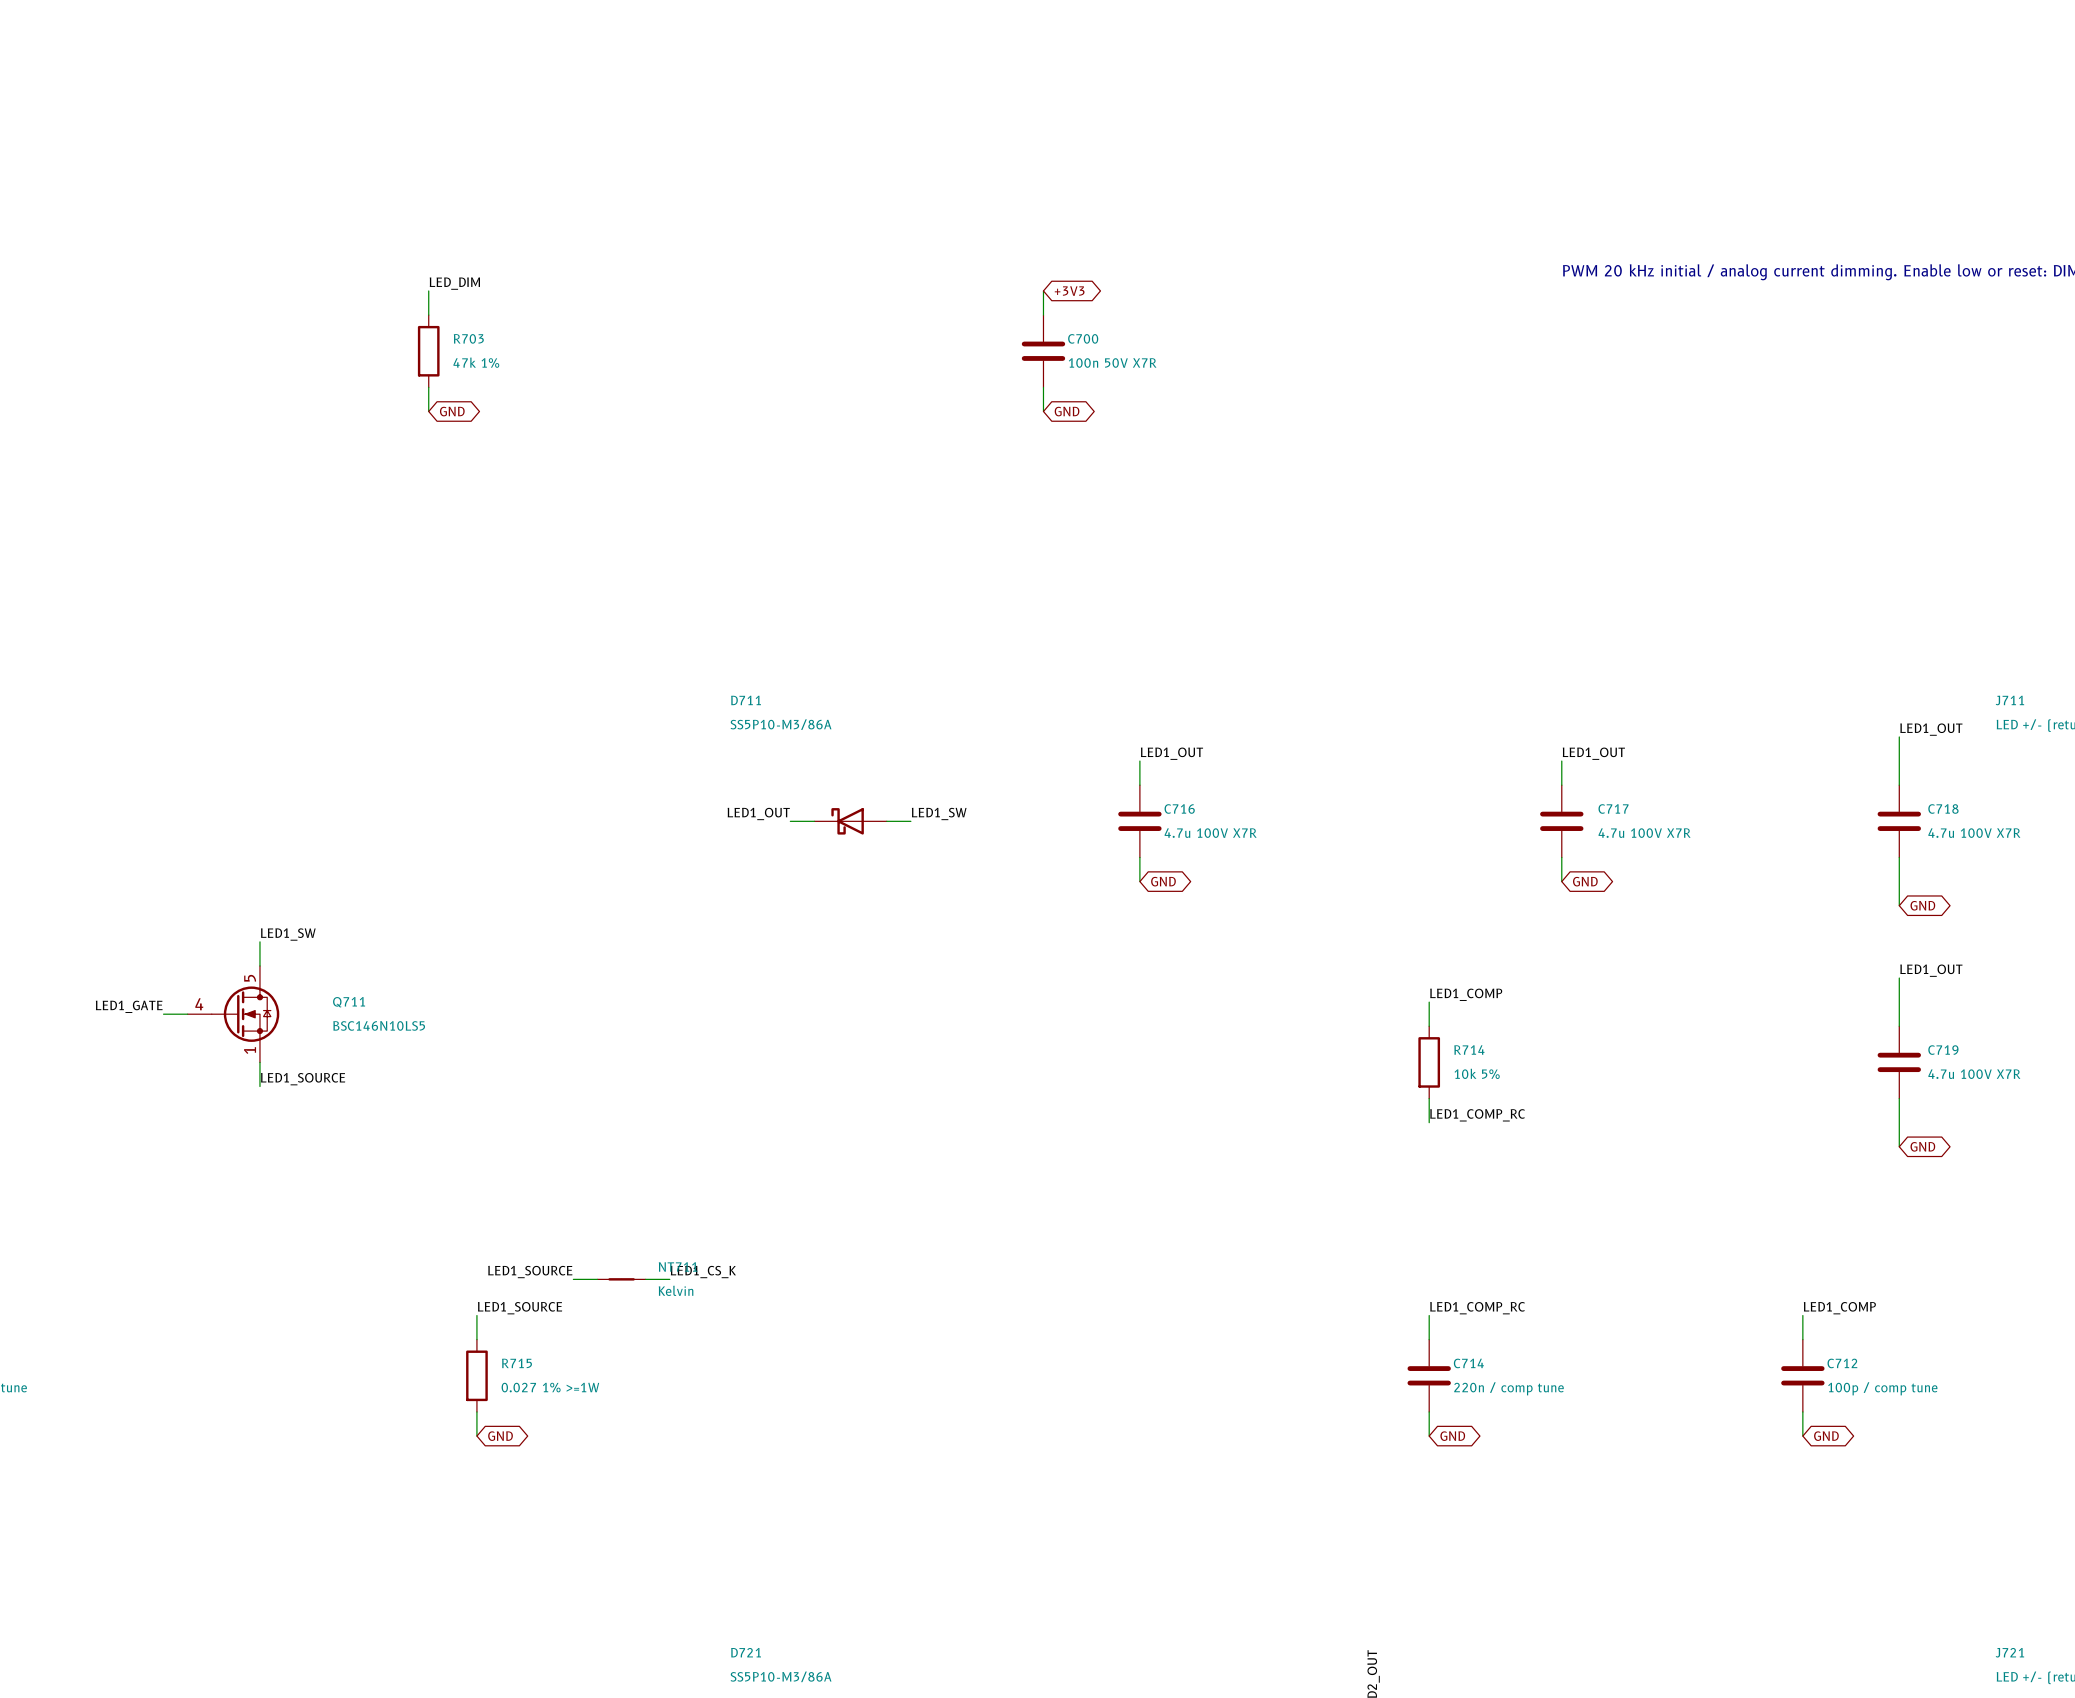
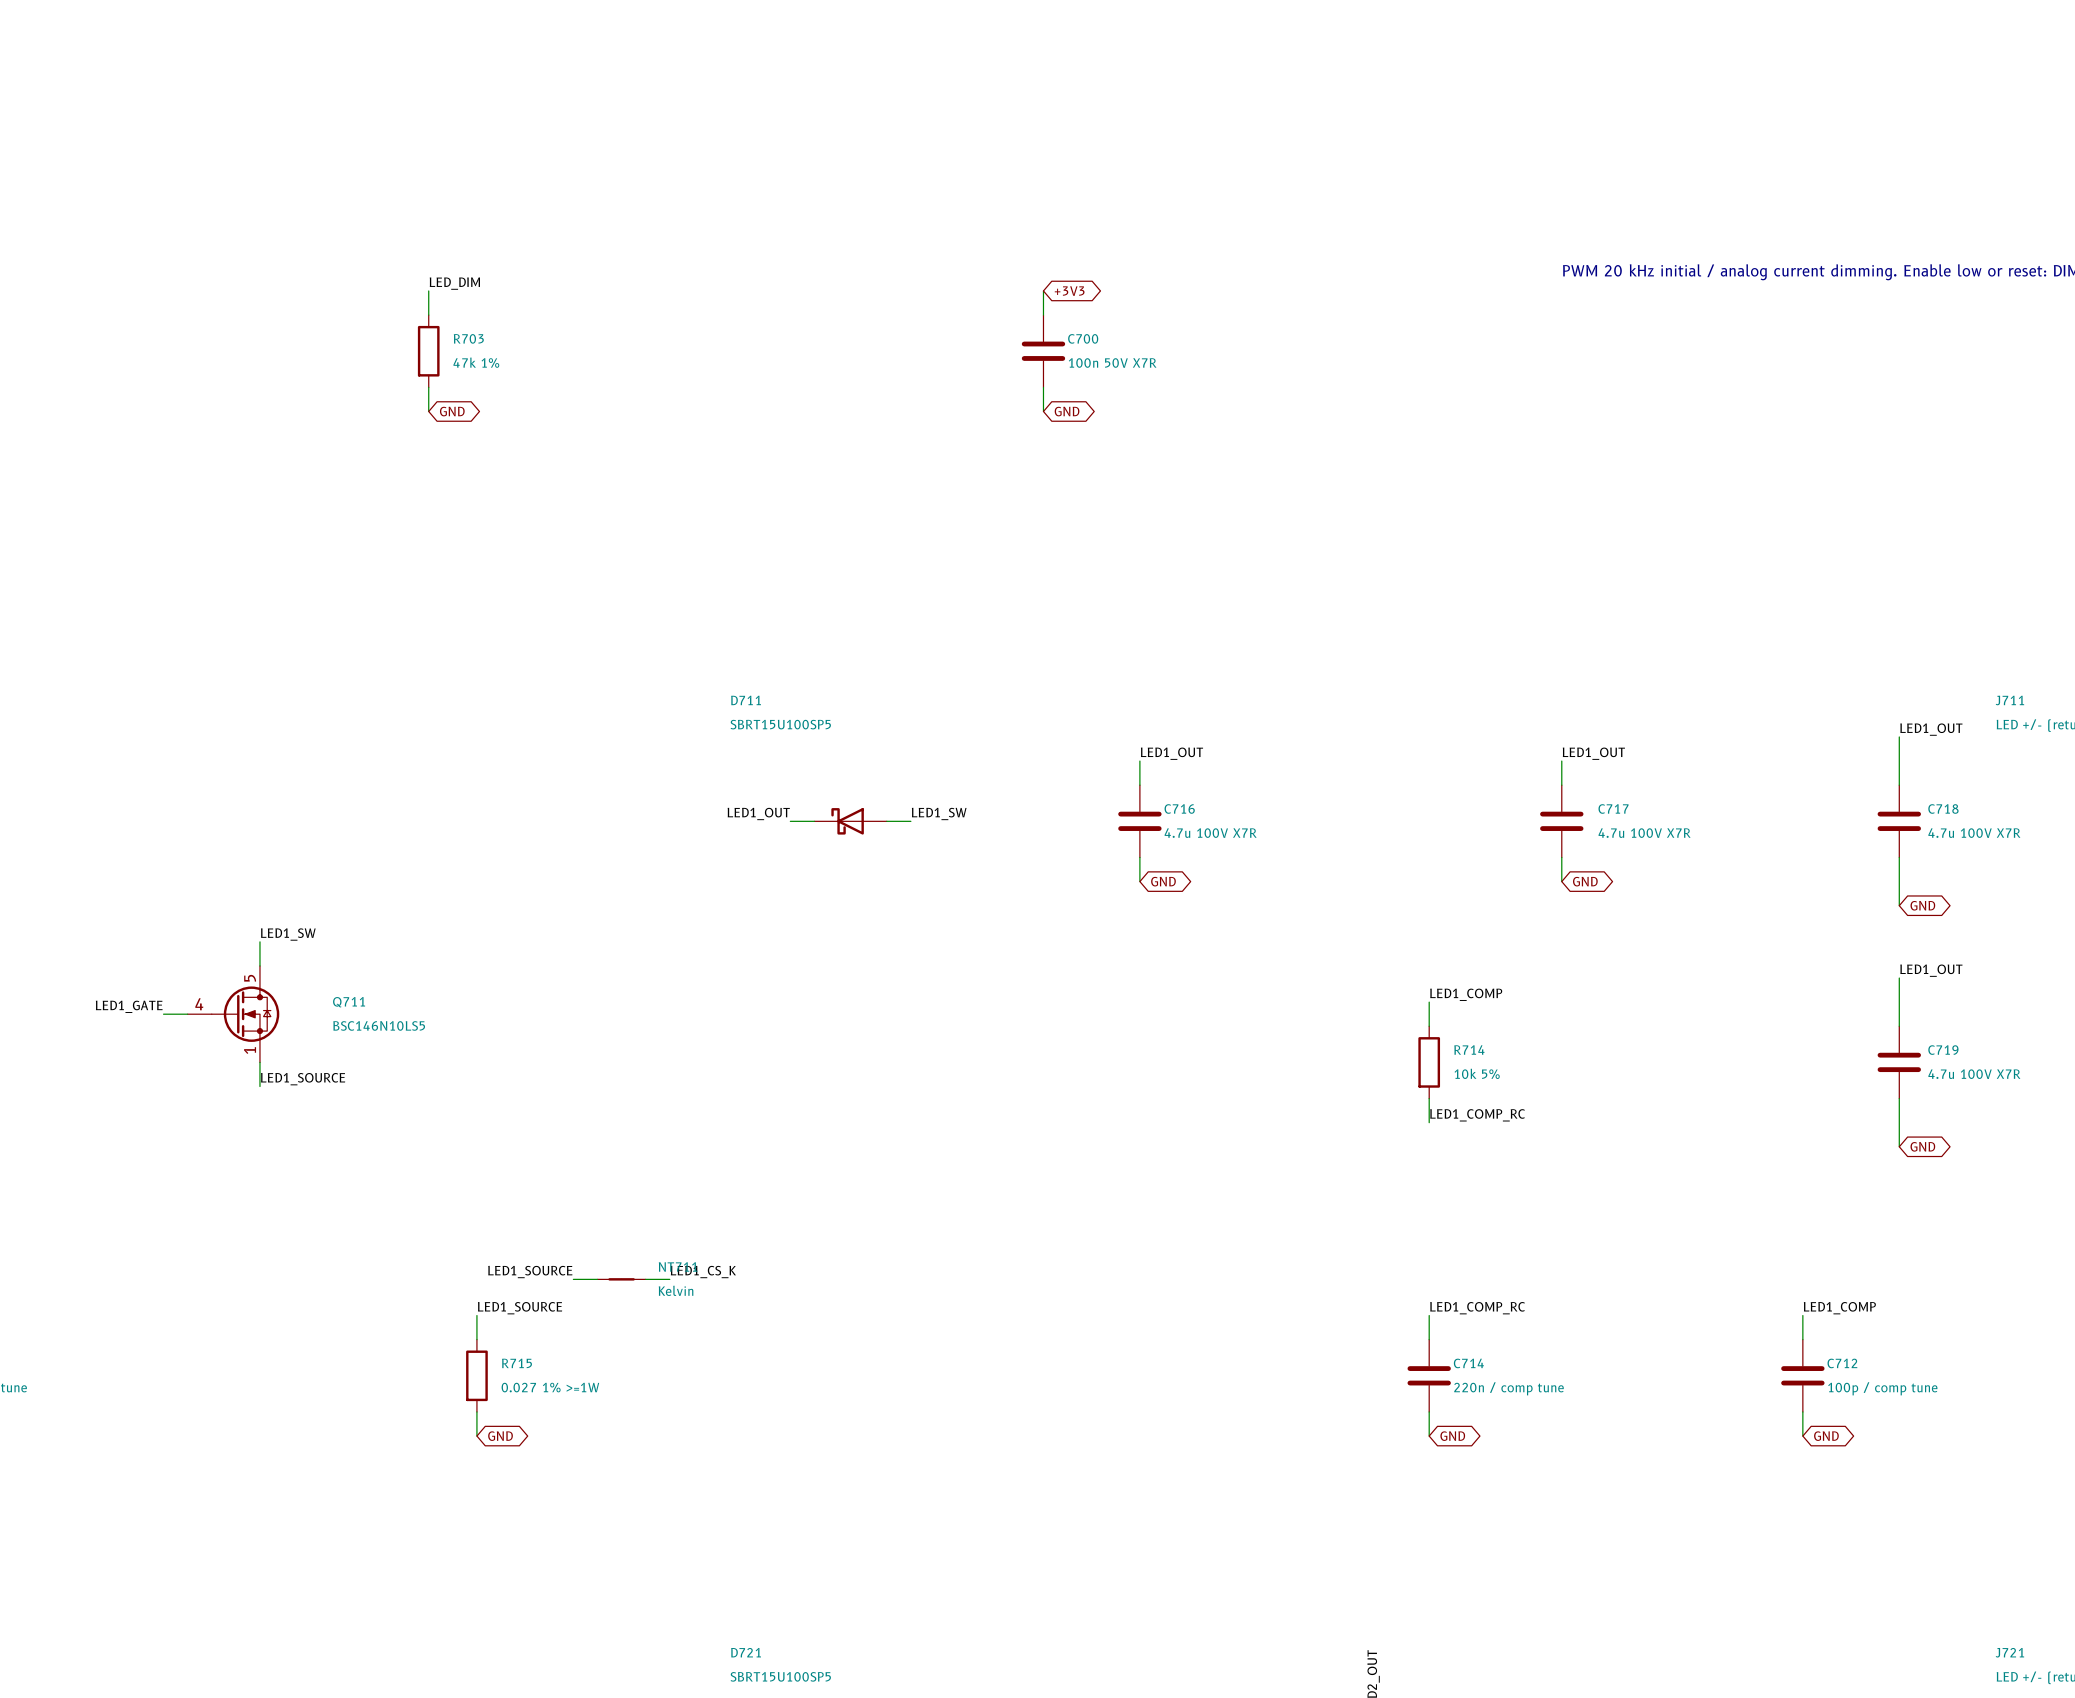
D711 value: SS5P10-M3/86A (781, 724) -> SBRT15U100SP5 (780, 724)
D721 value: SS5P10-M3/86A (781, 1676) -> SBRT15U100SP5 (780, 1676)

